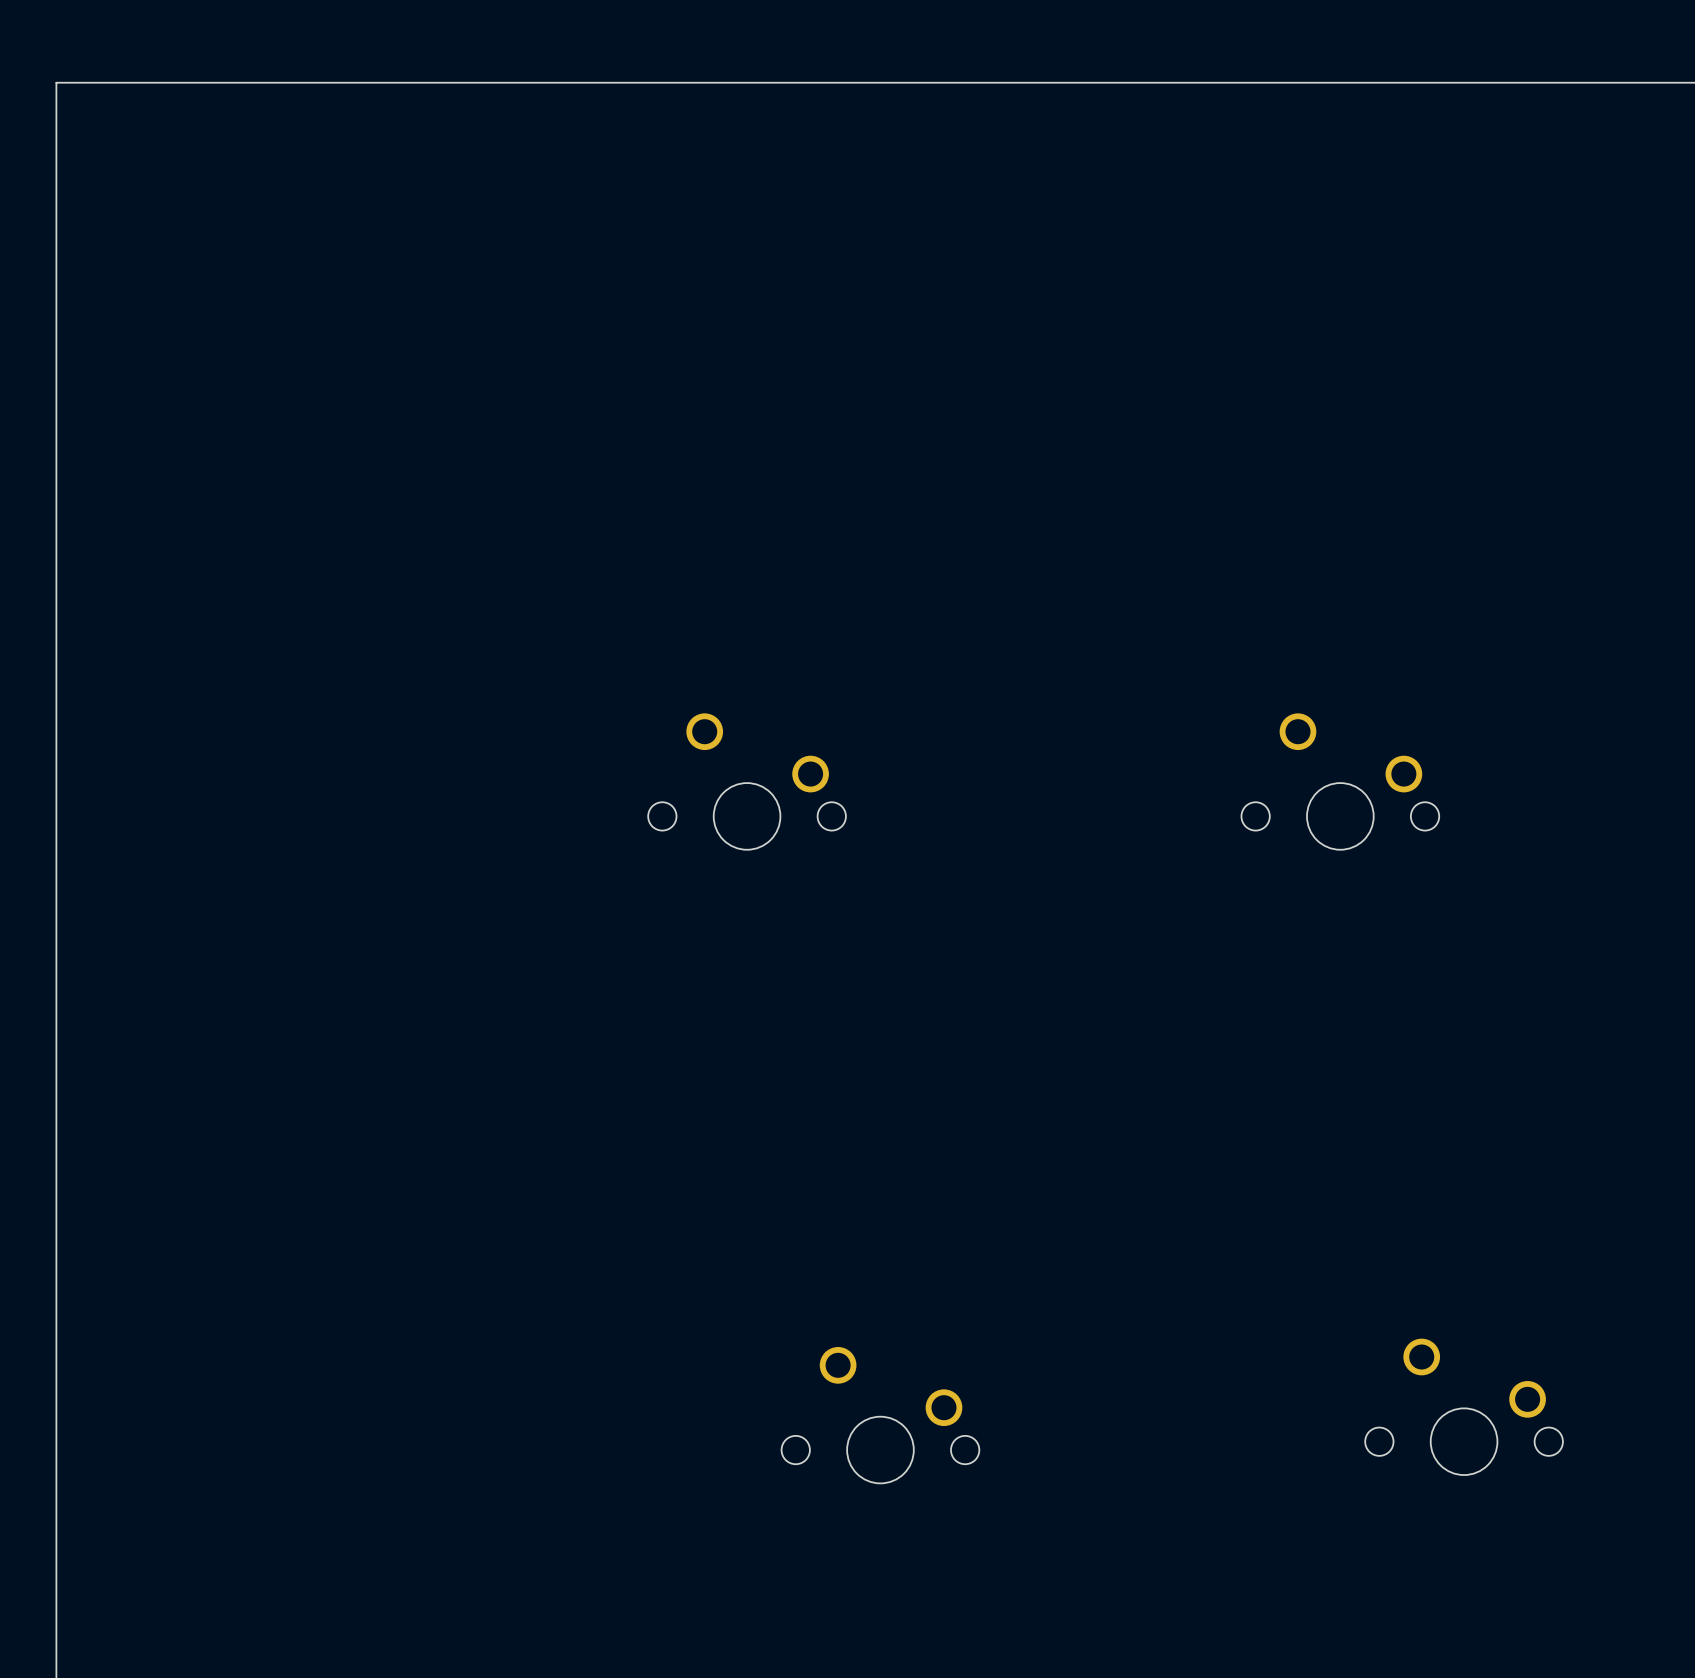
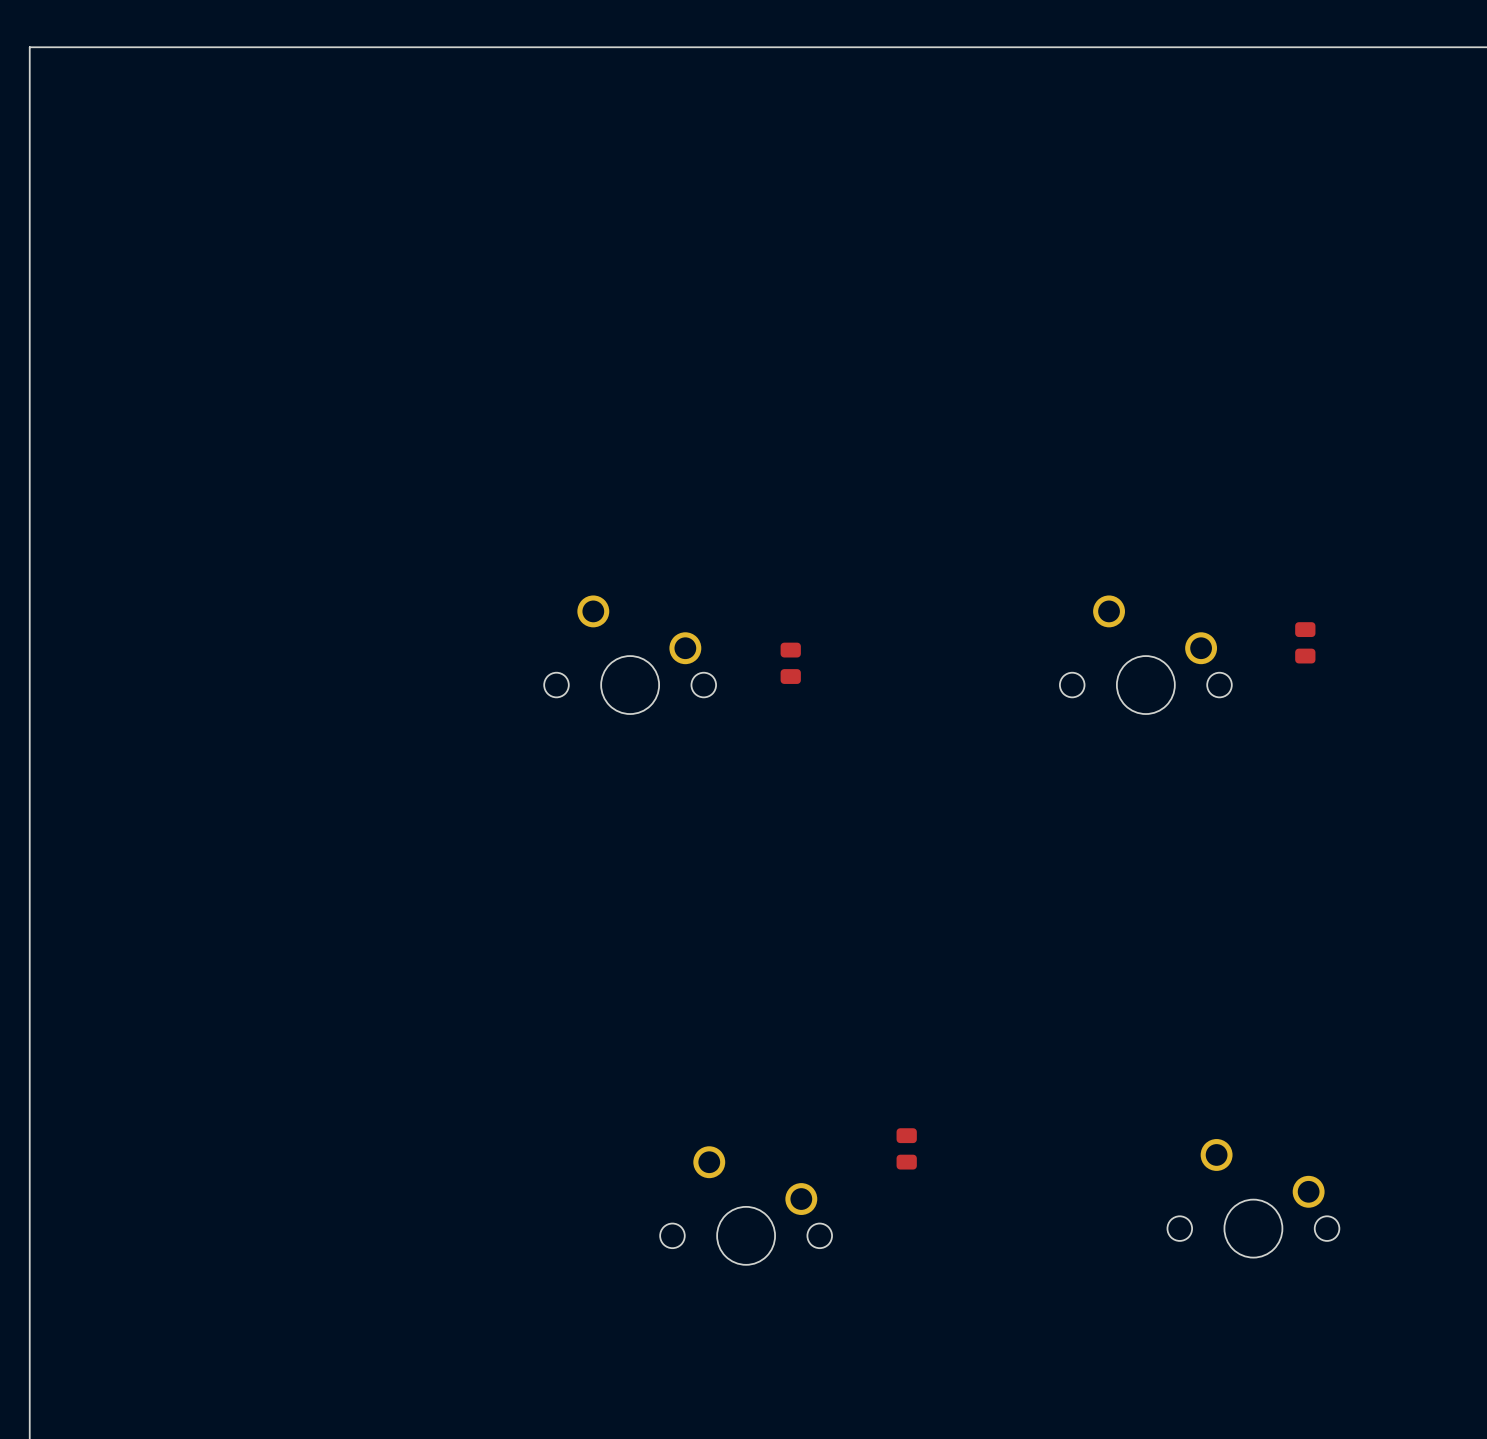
part: none -> (1305, 642)
part: none -> (790, 663)
part: none -> (906, 1148)

